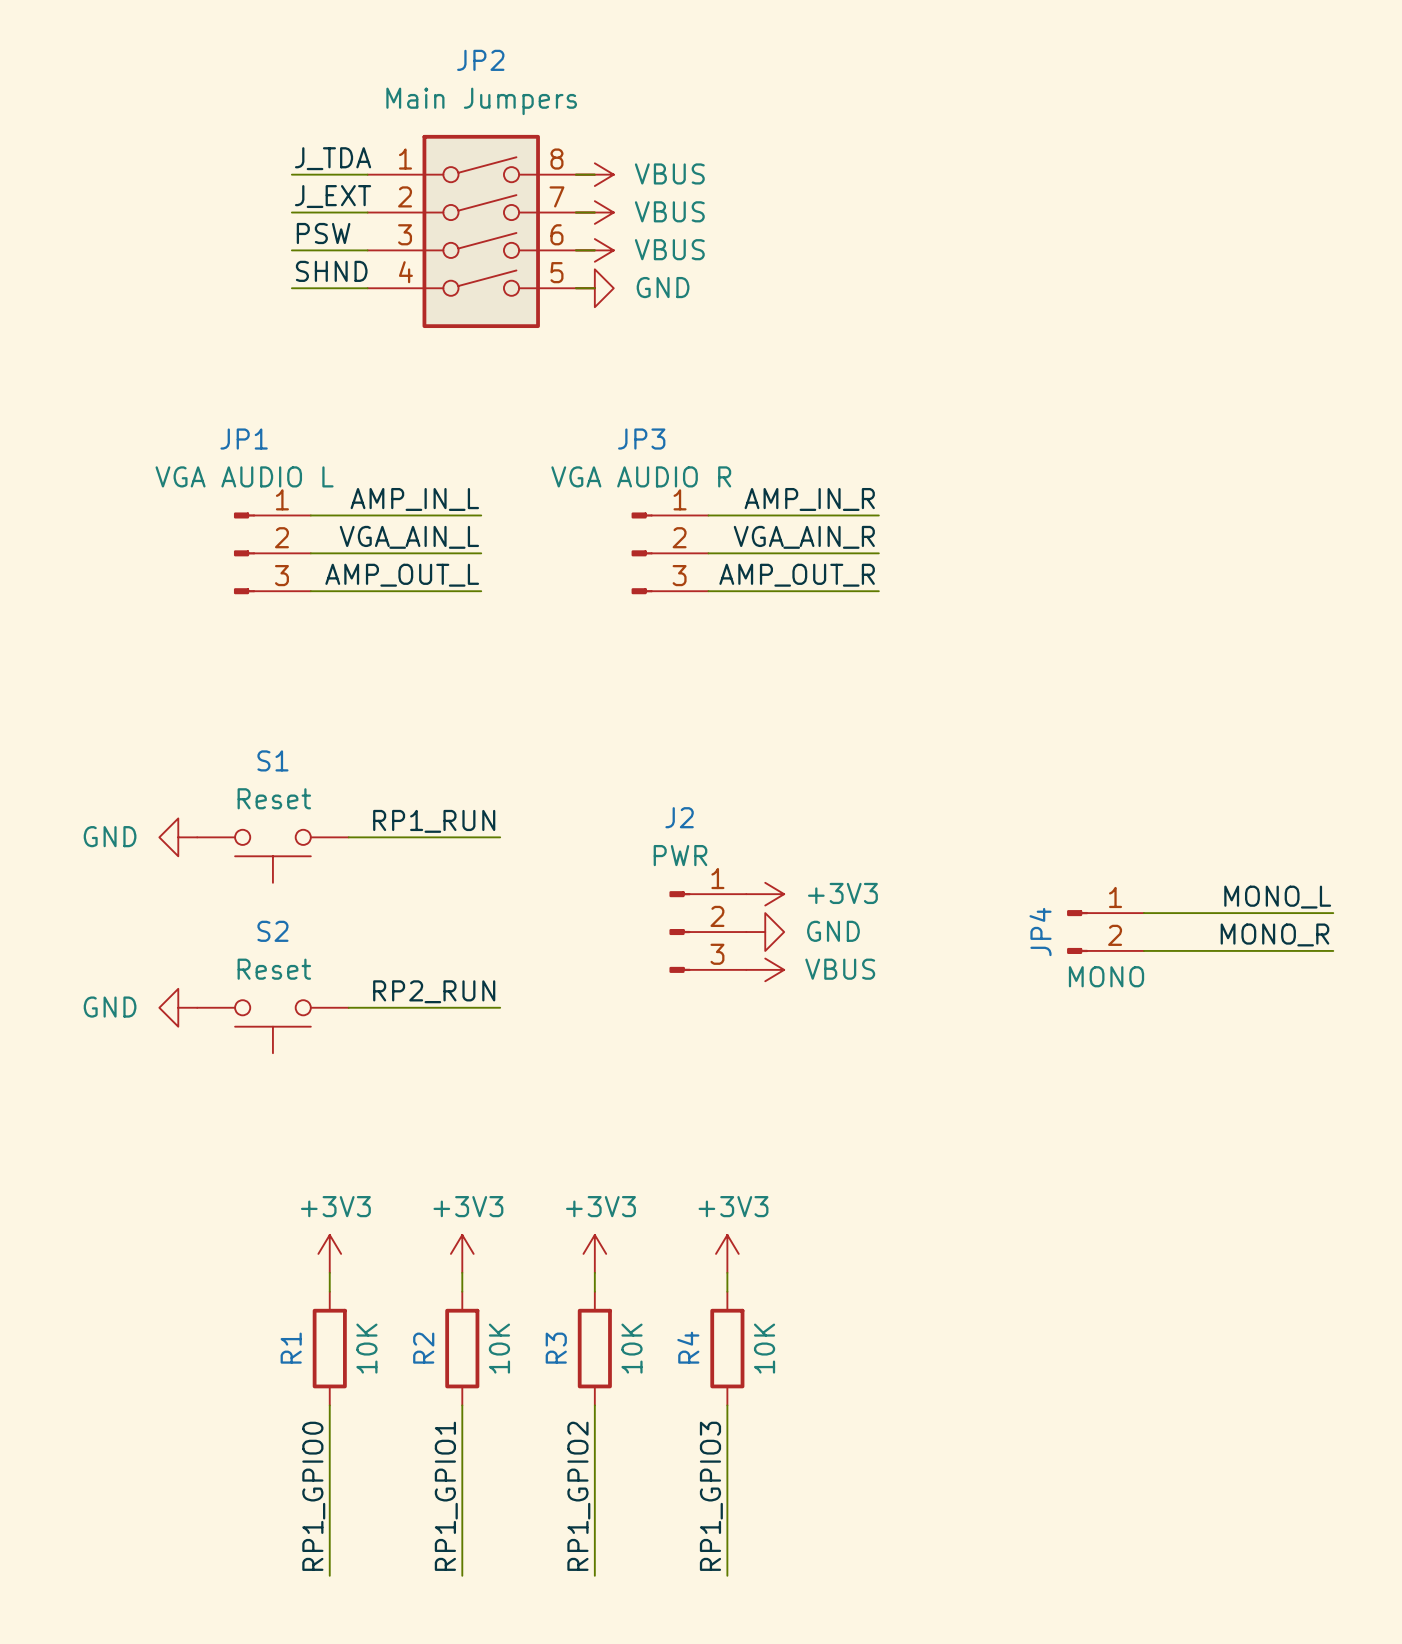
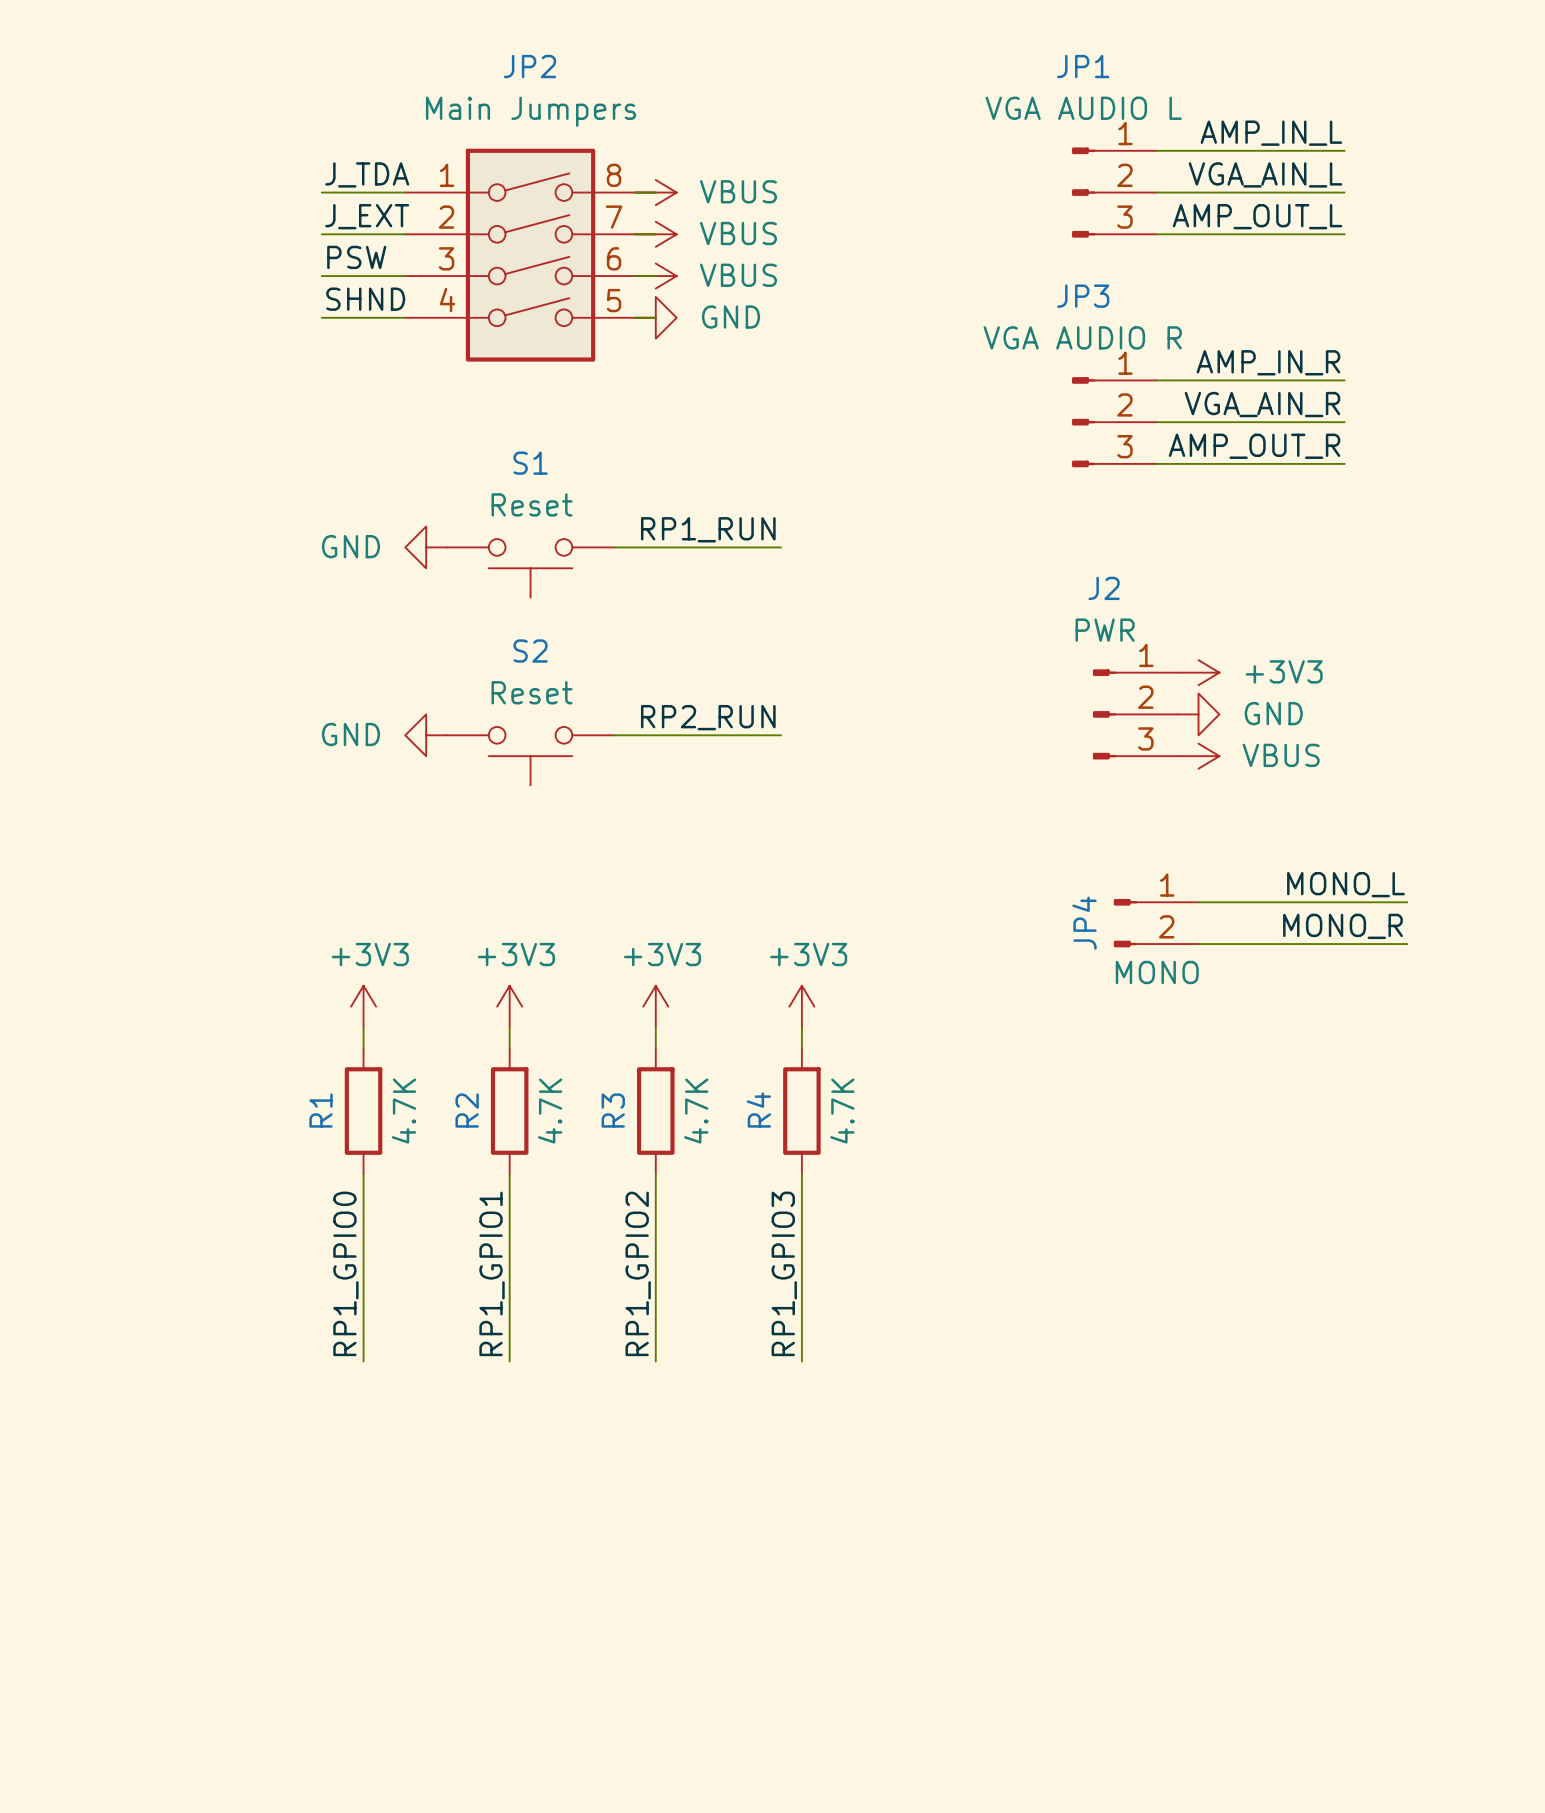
label: none -> AMP_IN_L (1271, 133)
wire: none -> (1156, 150) (1344, 150)
label: none -> VGA_AIN_L (1265, 174)
wire: none -> (1156, 192) (1344, 192)
label: none -> AMP_OUT_L (1257, 216)
wire: none -> (1156, 234) (1344, 234)
label: none -> AMP_IN_R (1268, 362)
wire: none -> (1156, 380) (1344, 380)
label: none -> VGA_AIN_R (1262, 404)
label: none -> AMP_OUT_R (1254, 446)
label: none -> RP1_RUN (708, 529)
power symbol: none -> GND (426, 547)
wire: none -> (614, 547) (781, 547)
label: AMP_IN_L (414, 499) -> none
label: AMP_IN_R (809, 499) -> none
wire: (310, 515) (481, 515) -> none
wire: (708, 515) (878, 515) -> (1156, 422) (1344, 422)
label: VGA_AIN_L (409, 537) -> none
label: VGA_AIN_R (804, 537) -> none
JP1 position: (272, 553) -> (1114, 192)
wire: (310, 553) (481, 553) -> none
JP3 position: (670, 553) -> (1114, 422)
wire: (708, 553) (878, 553) -> (1156, 463) (1344, 463)
label: AMP_OUT_L (402, 575) -> none
label: AMP_OUT_R (797, 575) -> none
wire: (310, 591) (481, 591) -> none
wire: (708, 591) (878, 591) -> none
power symbol: none -> +3V3 (1198, 672)
power symbol: none -> GND (1198, 714)
label: none -> RP2_RUN (708, 717)
power symbol: none -> GND (426, 735)
power symbol: none -> VBUS (1198, 756)
label: RP1_RUN (434, 821) -> none
power symbol: GND (178, 837) -> none
wire: (348, 837) (500, 837) -> (614, 735) (781, 735)
S1 position: (272, 856) -> (530, 568)
power symbol text position: +3V3 (842, 893) -> +3V3 (808, 954)
power symbol rotation: 0° (765, 894) -> 90° counterclockwise (801, 1006)
power symbol position: +3V3 (765, 894) -> +3V3 (801, 1006)
label position: MONO_L (1277, 897) -> MONO_L (1345, 884)
power symbol: none -> +3V3 (363, 1006)
power symbol: none -> +3V3 (509, 1006)
power symbol: none -> +3V3 (655, 1006)
wire: (1143, 913) (1333, 913) -> (1198, 902) (1407, 902)
J2 position: (707, 932) -> (1135, 714)
power symbol: GND (765, 932) -> none
JP4 position: (1105, 932) -> (1156, 923)
label position: MONO_R (1274, 934) -> MONO_R (1342, 926)
wire: (1143, 950) (1333, 950) -> (1198, 944) (1407, 944)
power symbol: VBUS (765, 969) -> none
label: RP2_RUN (434, 991) -> none
power symbol: GND (178, 1007) -> none
wire: (348, 1007) (500, 1007) -> none
S2 position: (272, 1026) -> (530, 756)
power symbol: +3V3 (329, 1253) -> none
power symbol: +3V3 (462, 1253) -> none
power symbol: +3V3 (594, 1253) -> none
power symbol: +3V3 (727, 1253) -> none
wire: (329, 1272) (329, 1291) -> (363, 1027) (363, 1048)
wire: (462, 1272) (462, 1291) -> (509, 1027) (509, 1048)
wire: (594, 1272) (594, 1291) -> (655, 1027) (655, 1048)
wire: (727, 1272) (727, 1291) -> (801, 1027) (801, 1048)
R1 position: (329, 1348) -> (363, 1111)
R1 value: 10K (366, 1348) -> 4.7K (404, 1111)
R2 position: (462, 1348) -> (509, 1111)
R2 value: 10K (499, 1348) -> 4.7K (550, 1111)
R3 position: (594, 1348) -> (655, 1111)
R3 value: 10K (631, 1348) -> 4.7K (696, 1111)
R4 position: (727, 1348) -> (801, 1111)
R4 value: 10K (764, 1348) -> 4.7K (842, 1111)
wire: (329, 1405) (329, 1575) -> (363, 1173) (363, 1361)
wire: (462, 1405) (462, 1575) -> (509, 1173) (509, 1361)
wire: (594, 1405) (594, 1575) -> (655, 1173) (655, 1361)
wire: (727, 1405) (727, 1575) -> (801, 1173) (801, 1361)
label position: RP1_GPIO0 (313, 1496) -> RP1_GPIO0 (345, 1273)
label position: RP1_GPIO1 (446, 1496) -> RP1_GPIO1 (492, 1273)
label position: RP1_GPIO2 (578, 1496) -> RP1_GPIO2 (638, 1273)
label position: RP1_GPIO3 (711, 1496) -> RP1_GPIO3 (784, 1273)

